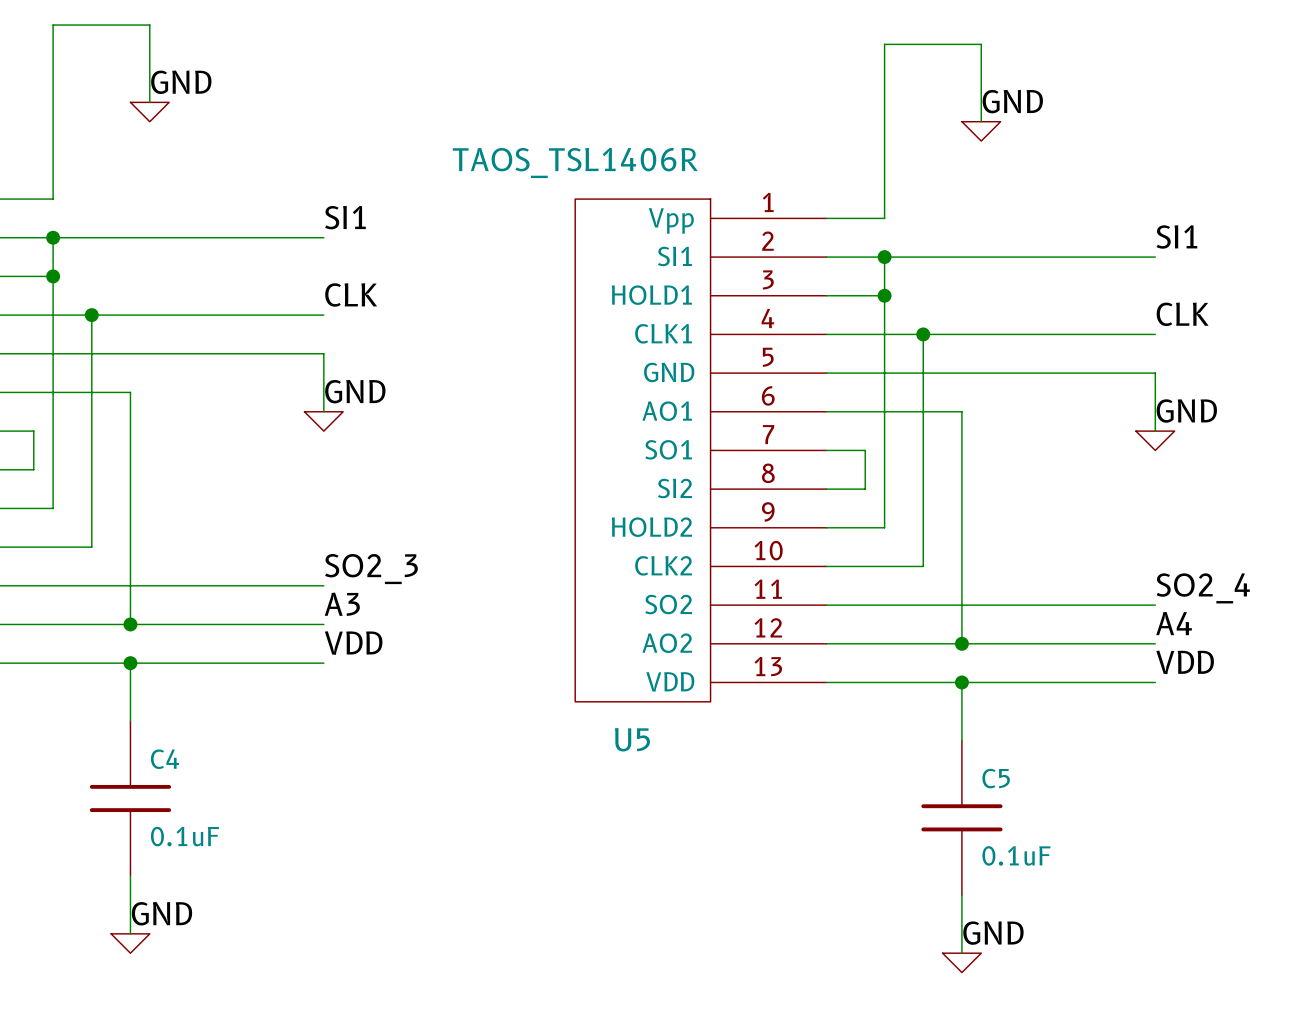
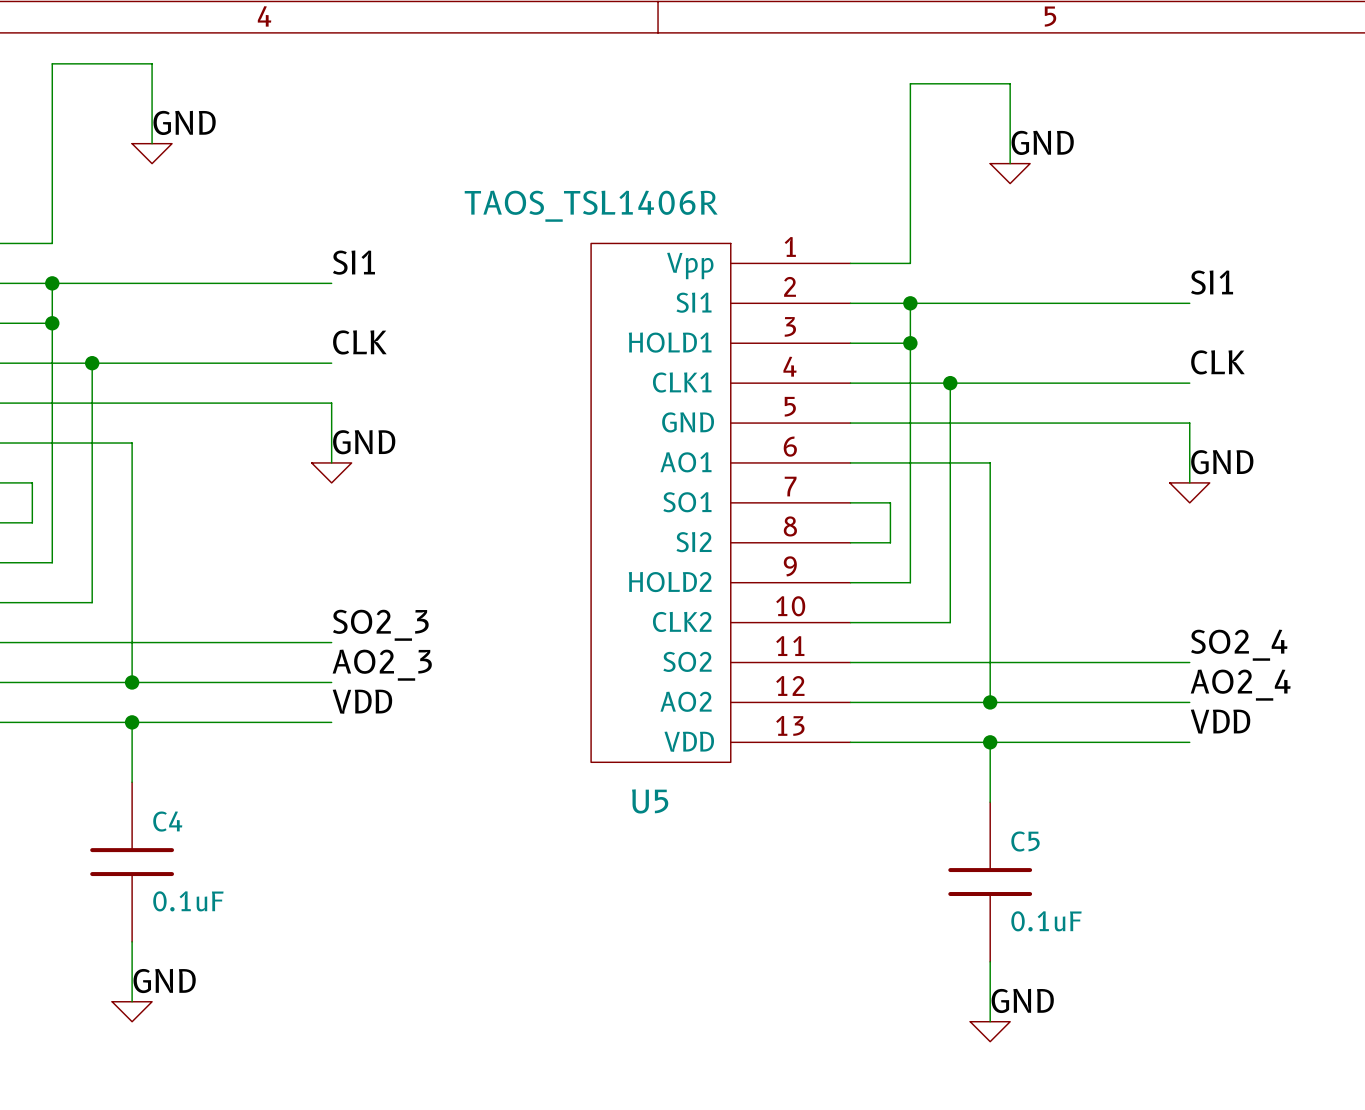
label: A3 (342, 604) -> AO2_3 (382, 665)
label: A4 (1174, 623) -> AO2_4 (1240, 685)

